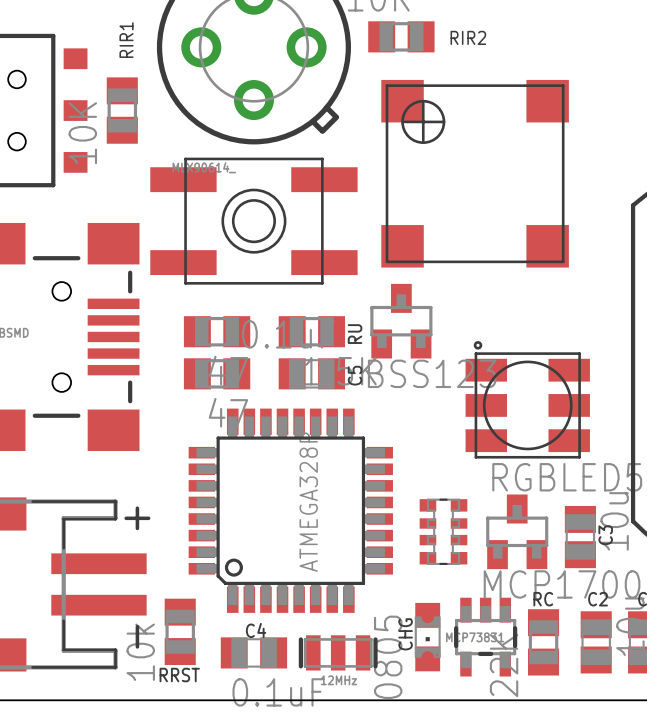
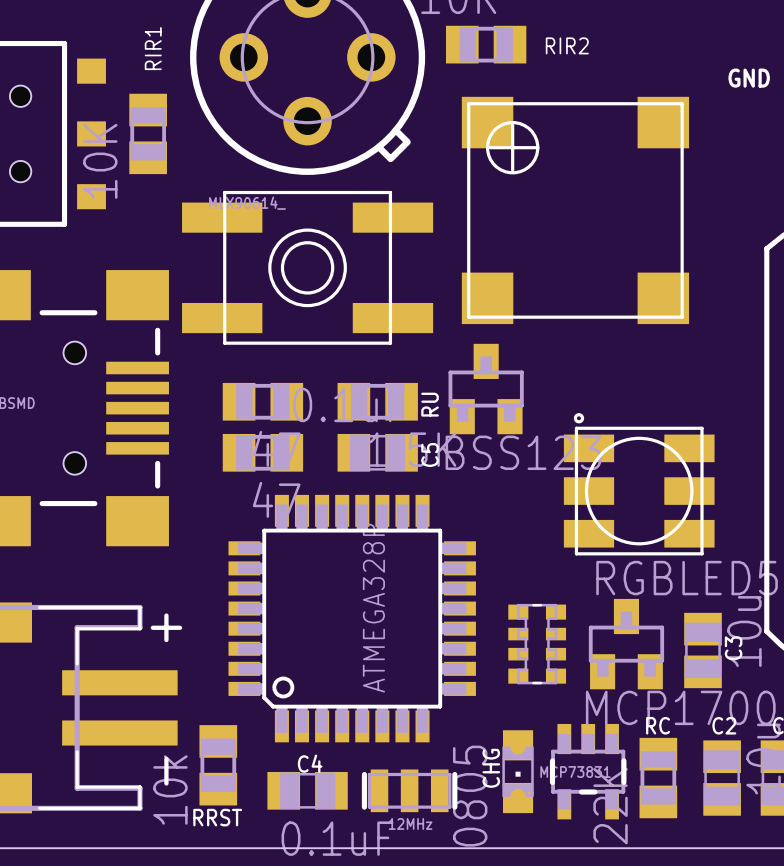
text: none -> GND (749, 78)

